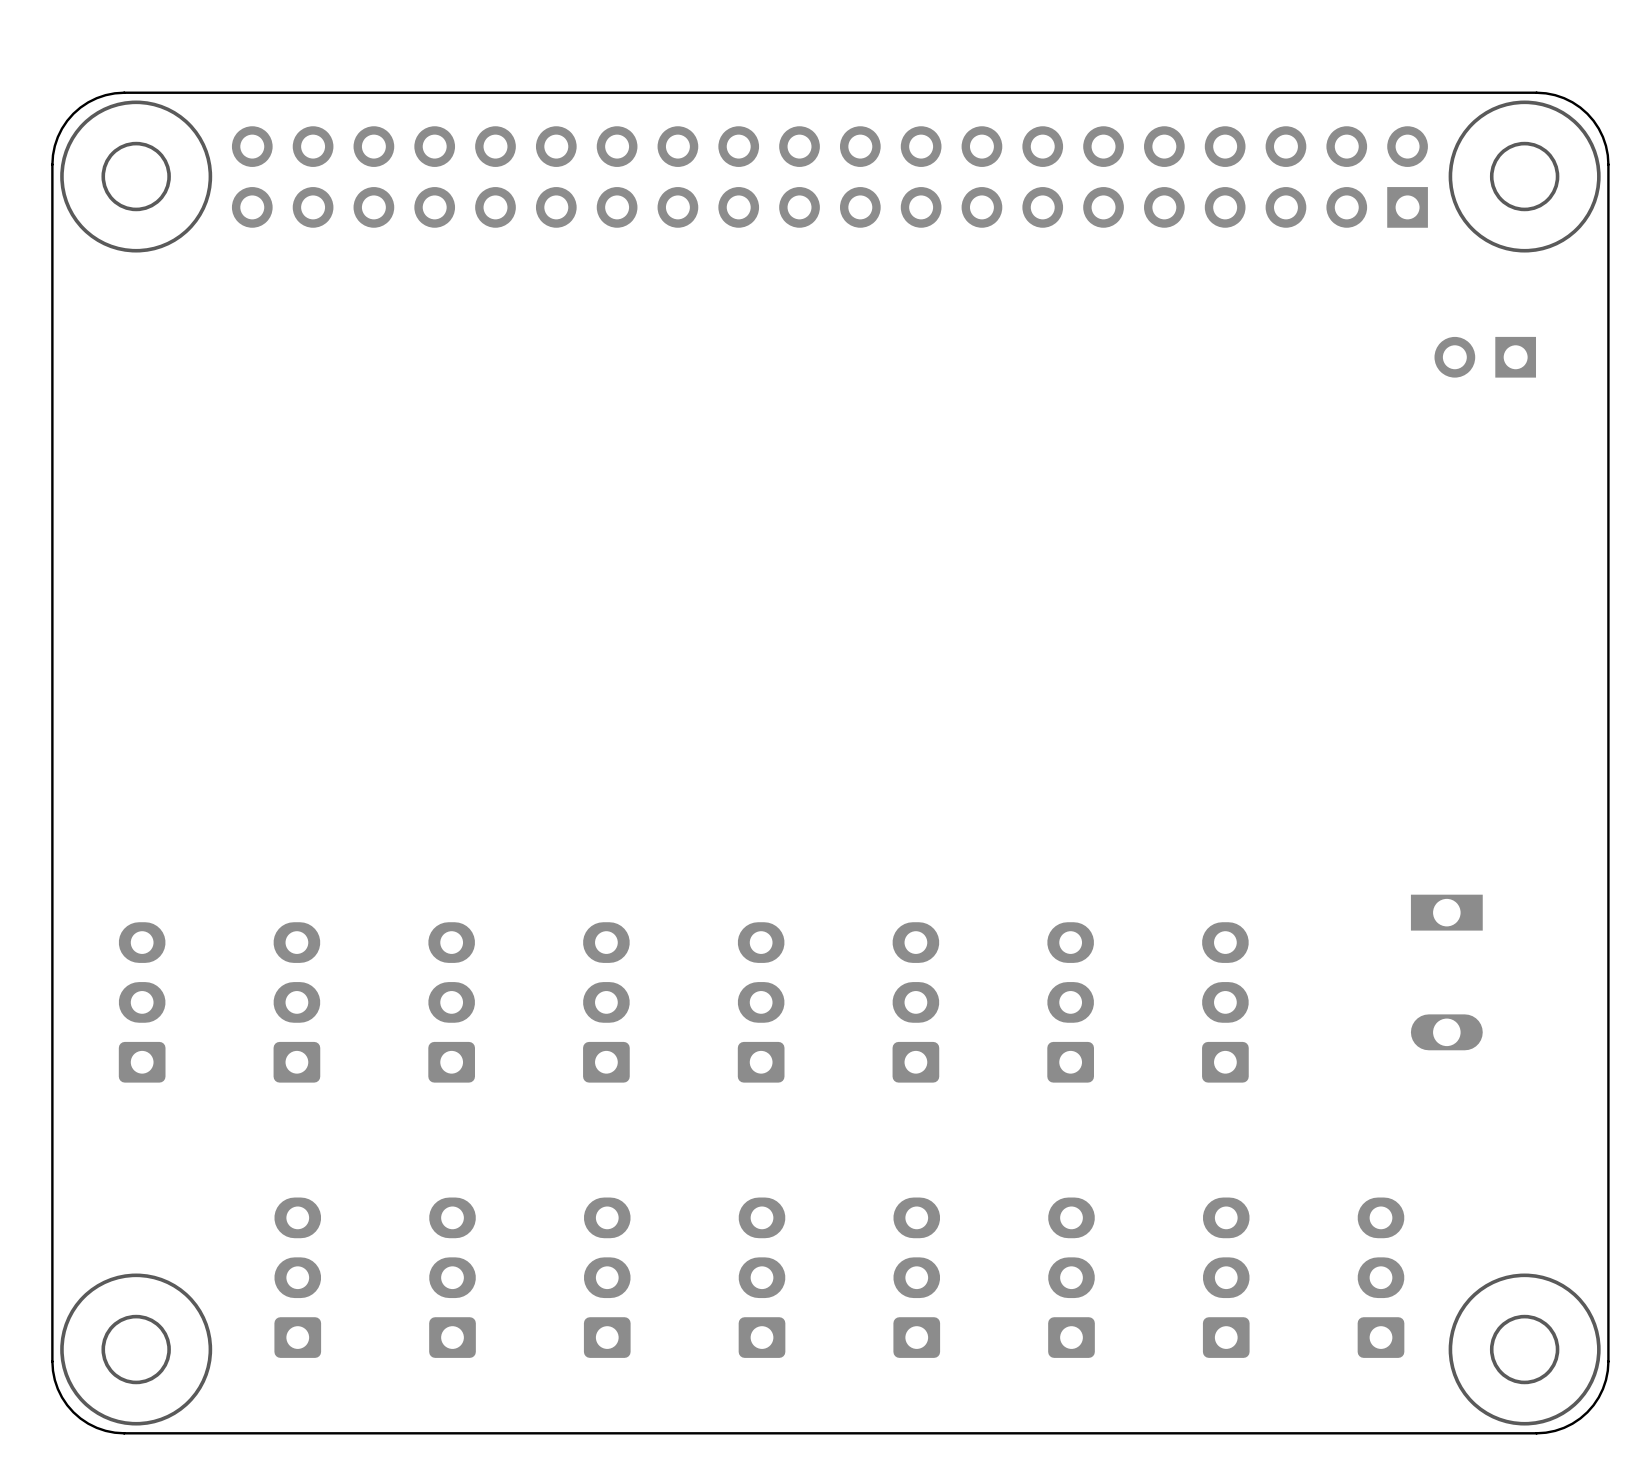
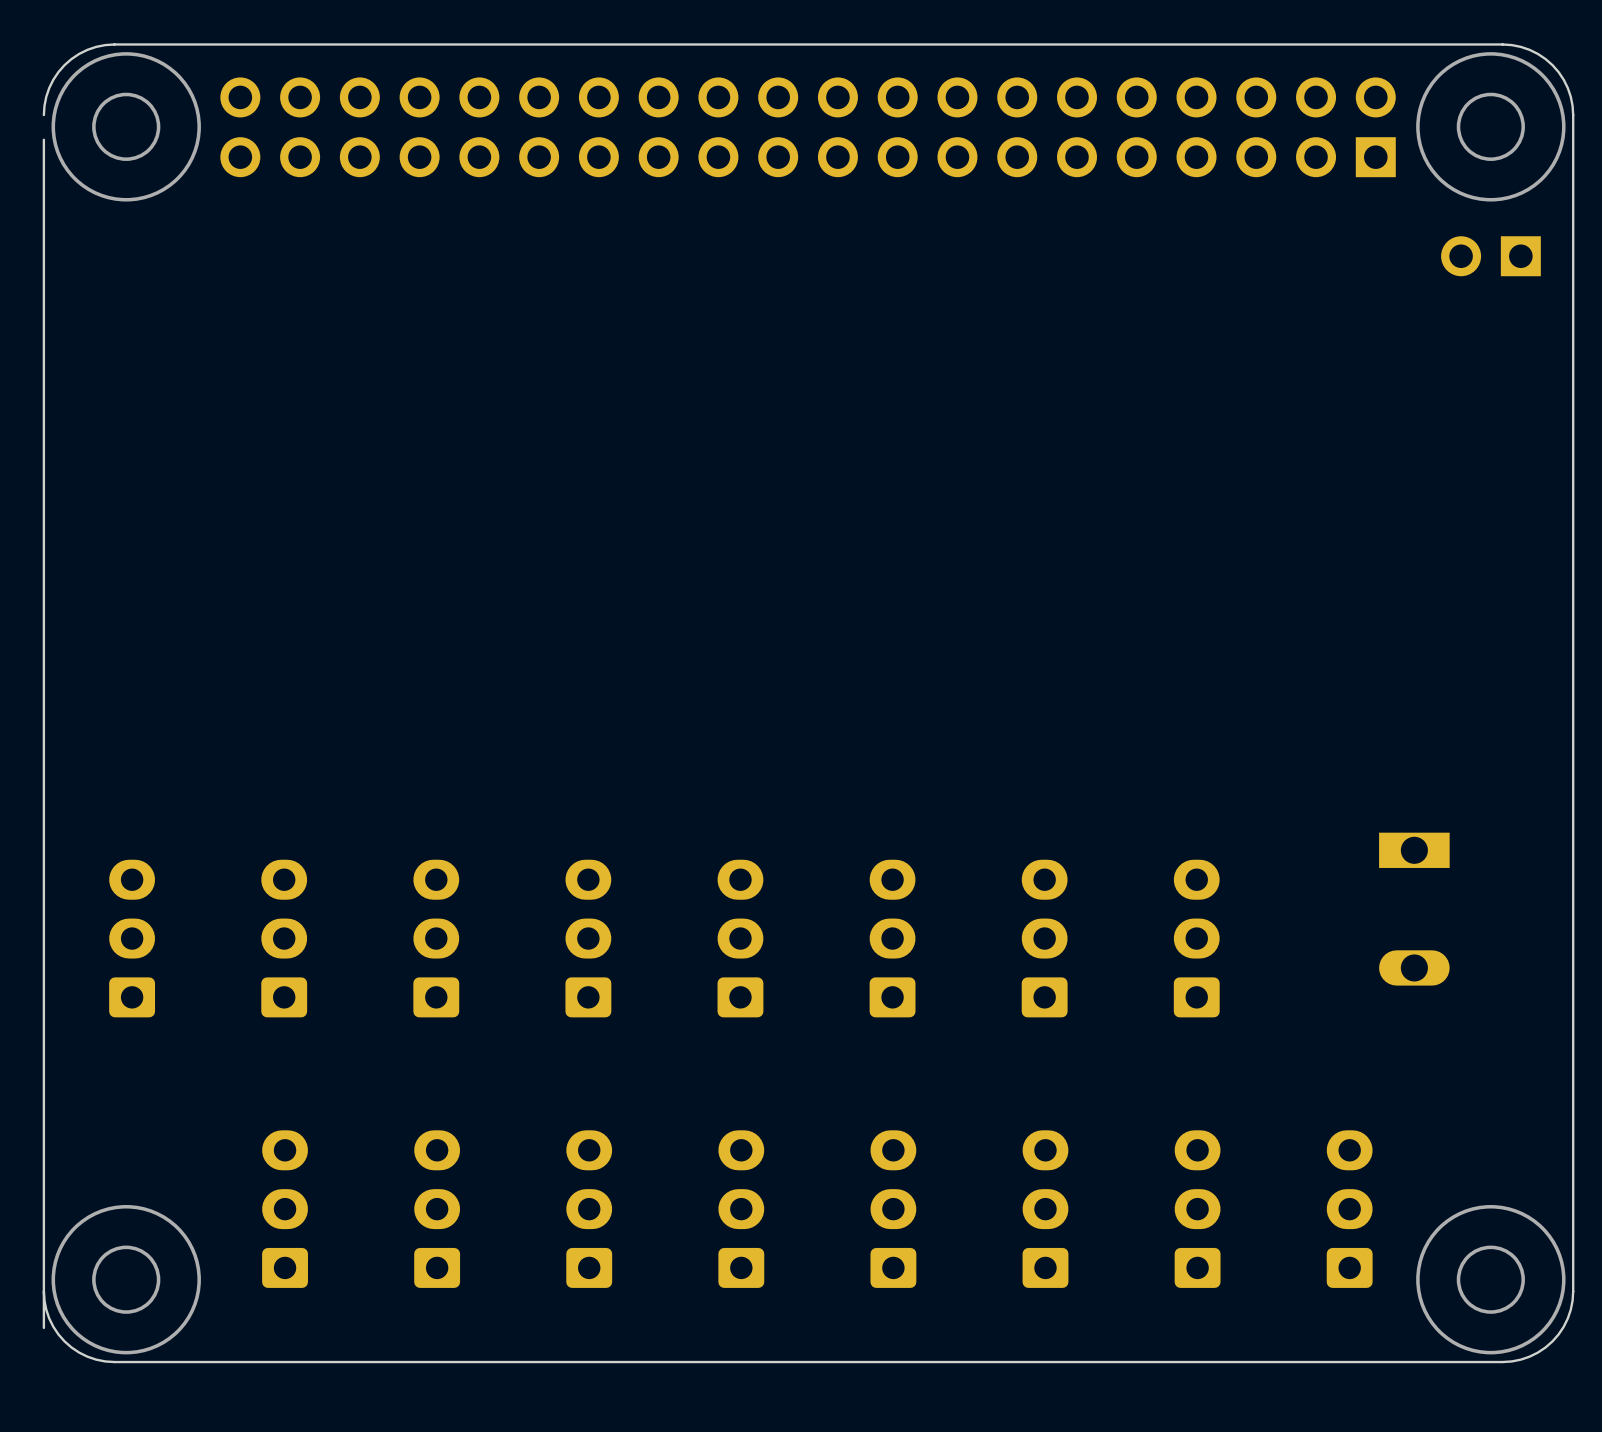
board edge: (52, 164) (52, 189) -> none
part position: (1485, 357) -> (1490, 256)
board edge: none -> (43, 1291) (43, 1327)

